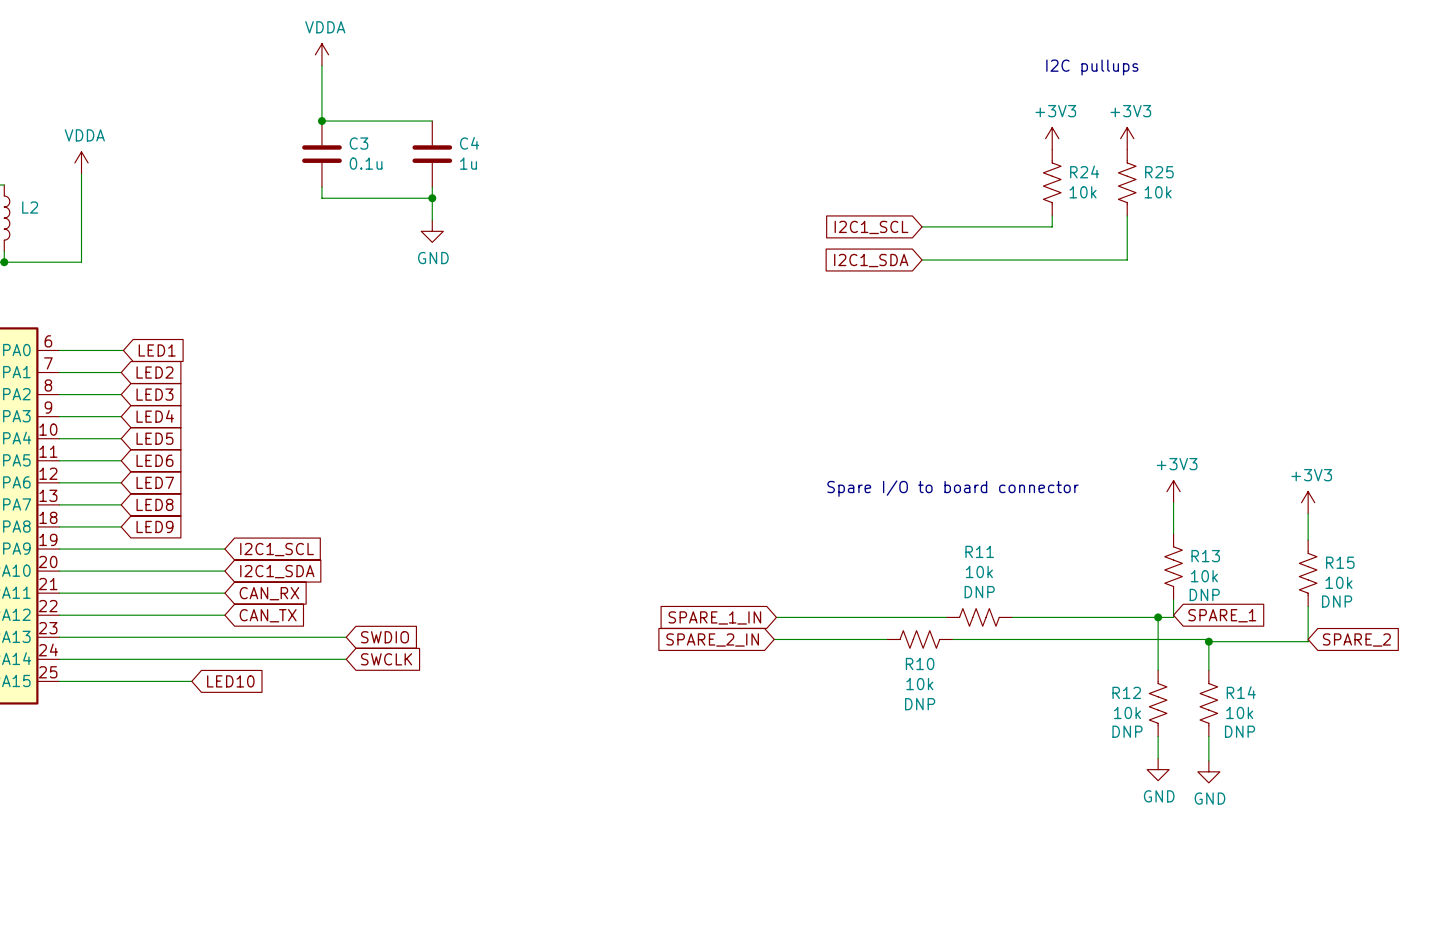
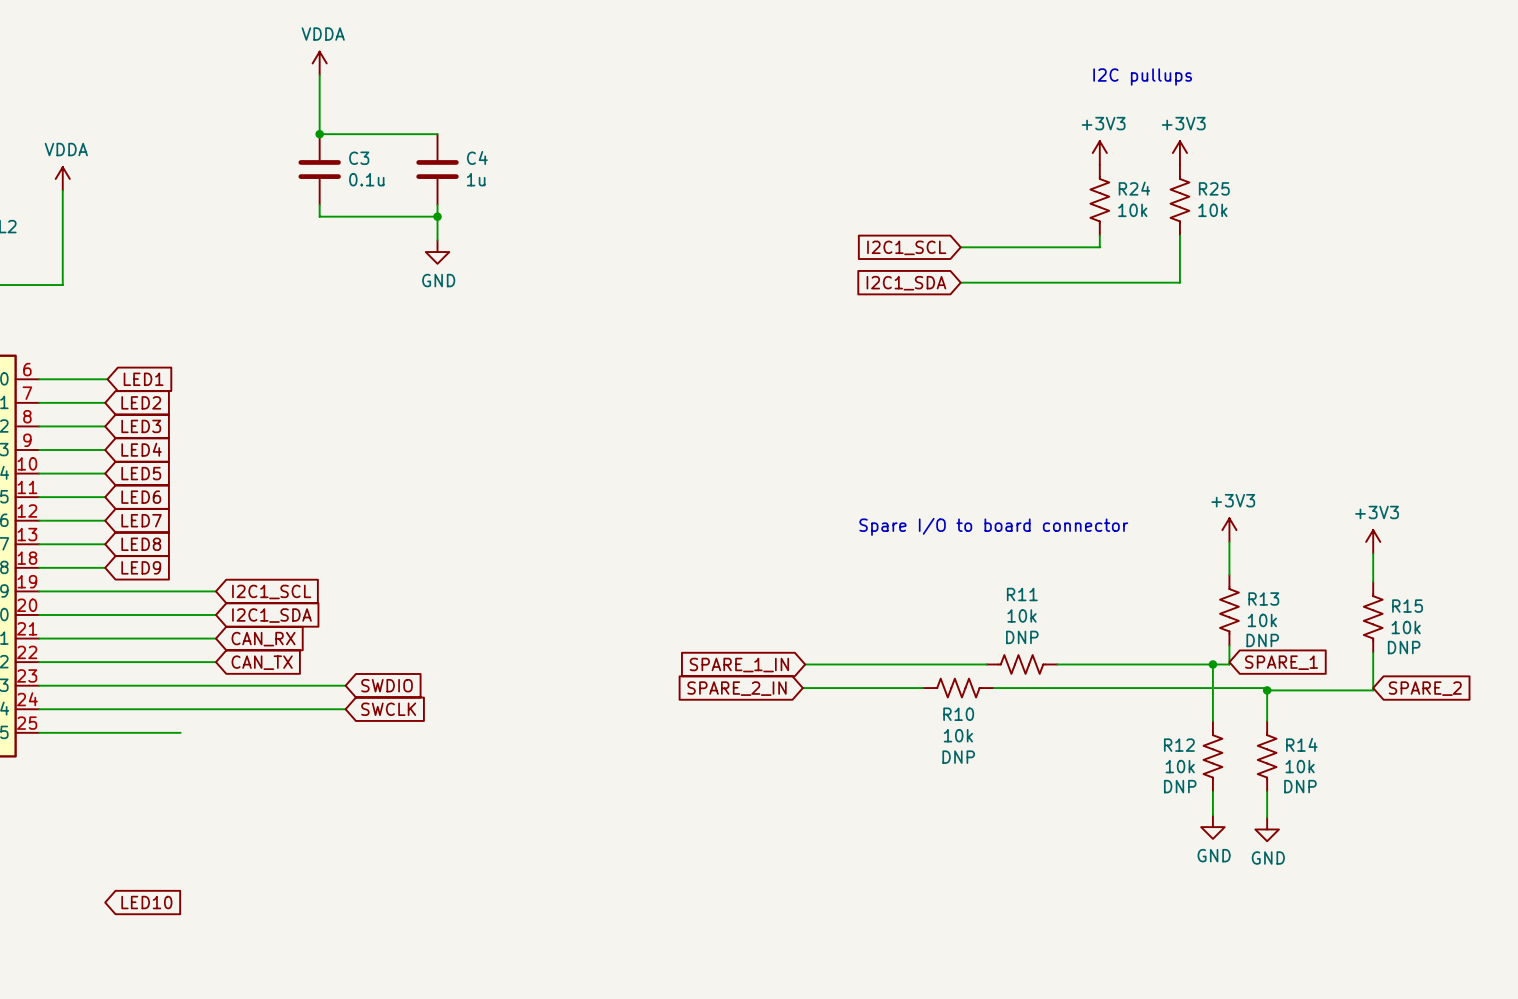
global label position: LED10 (230, 681) -> LED10 (146, 902)

